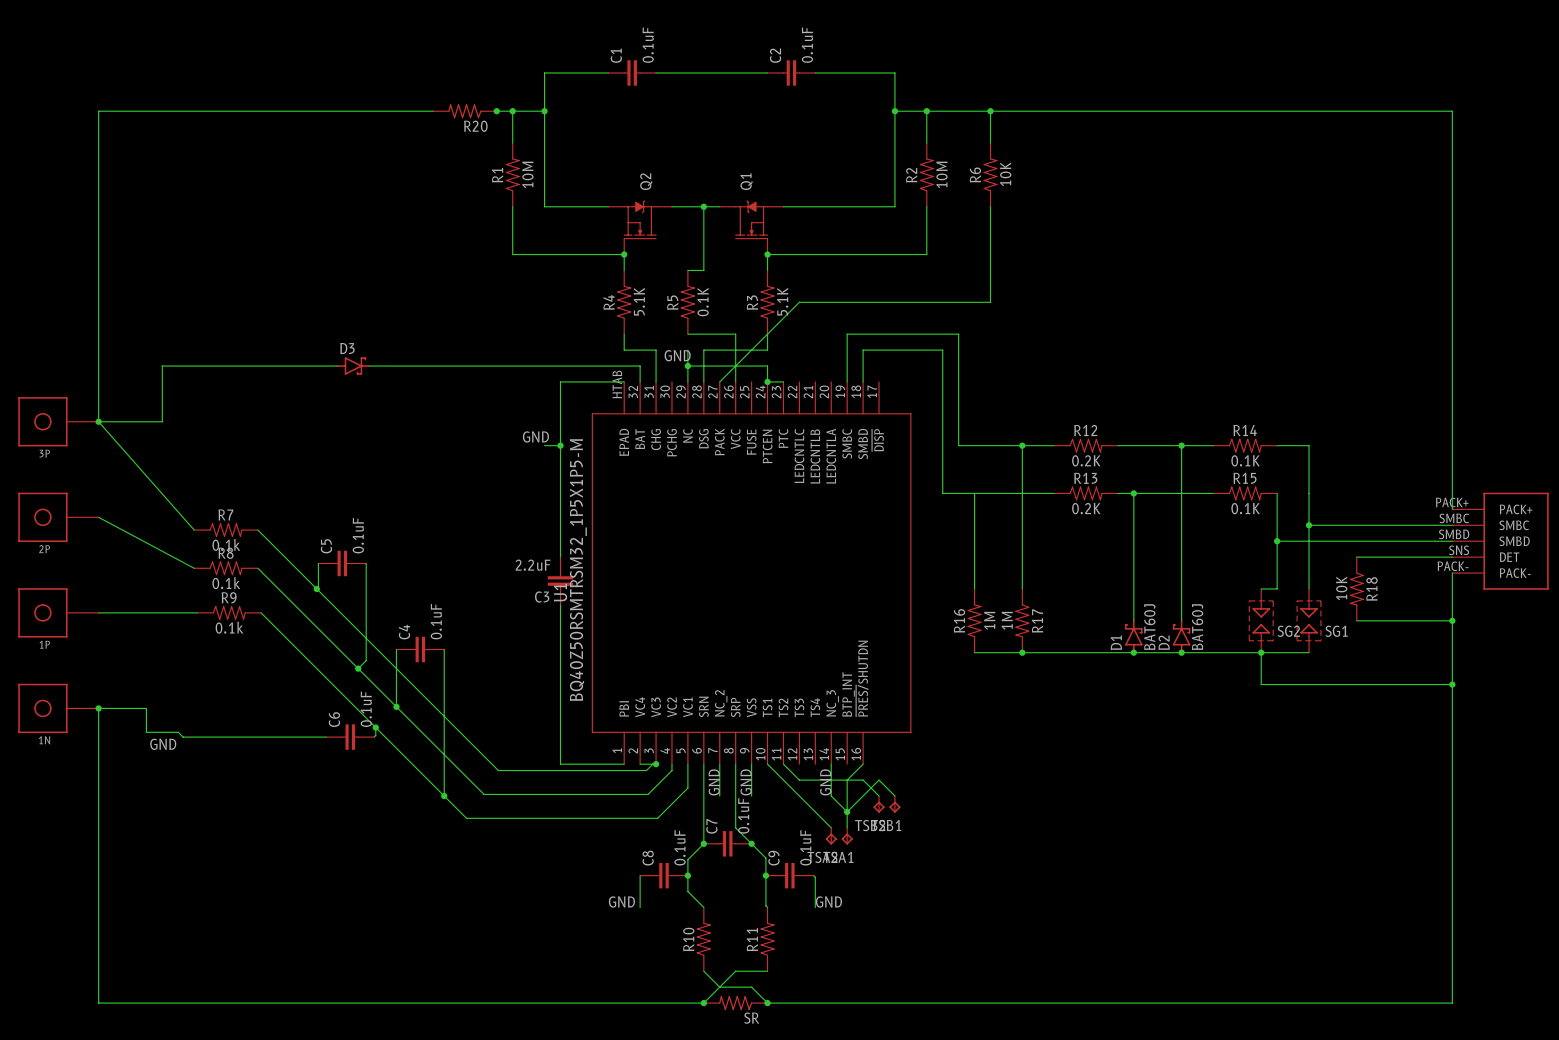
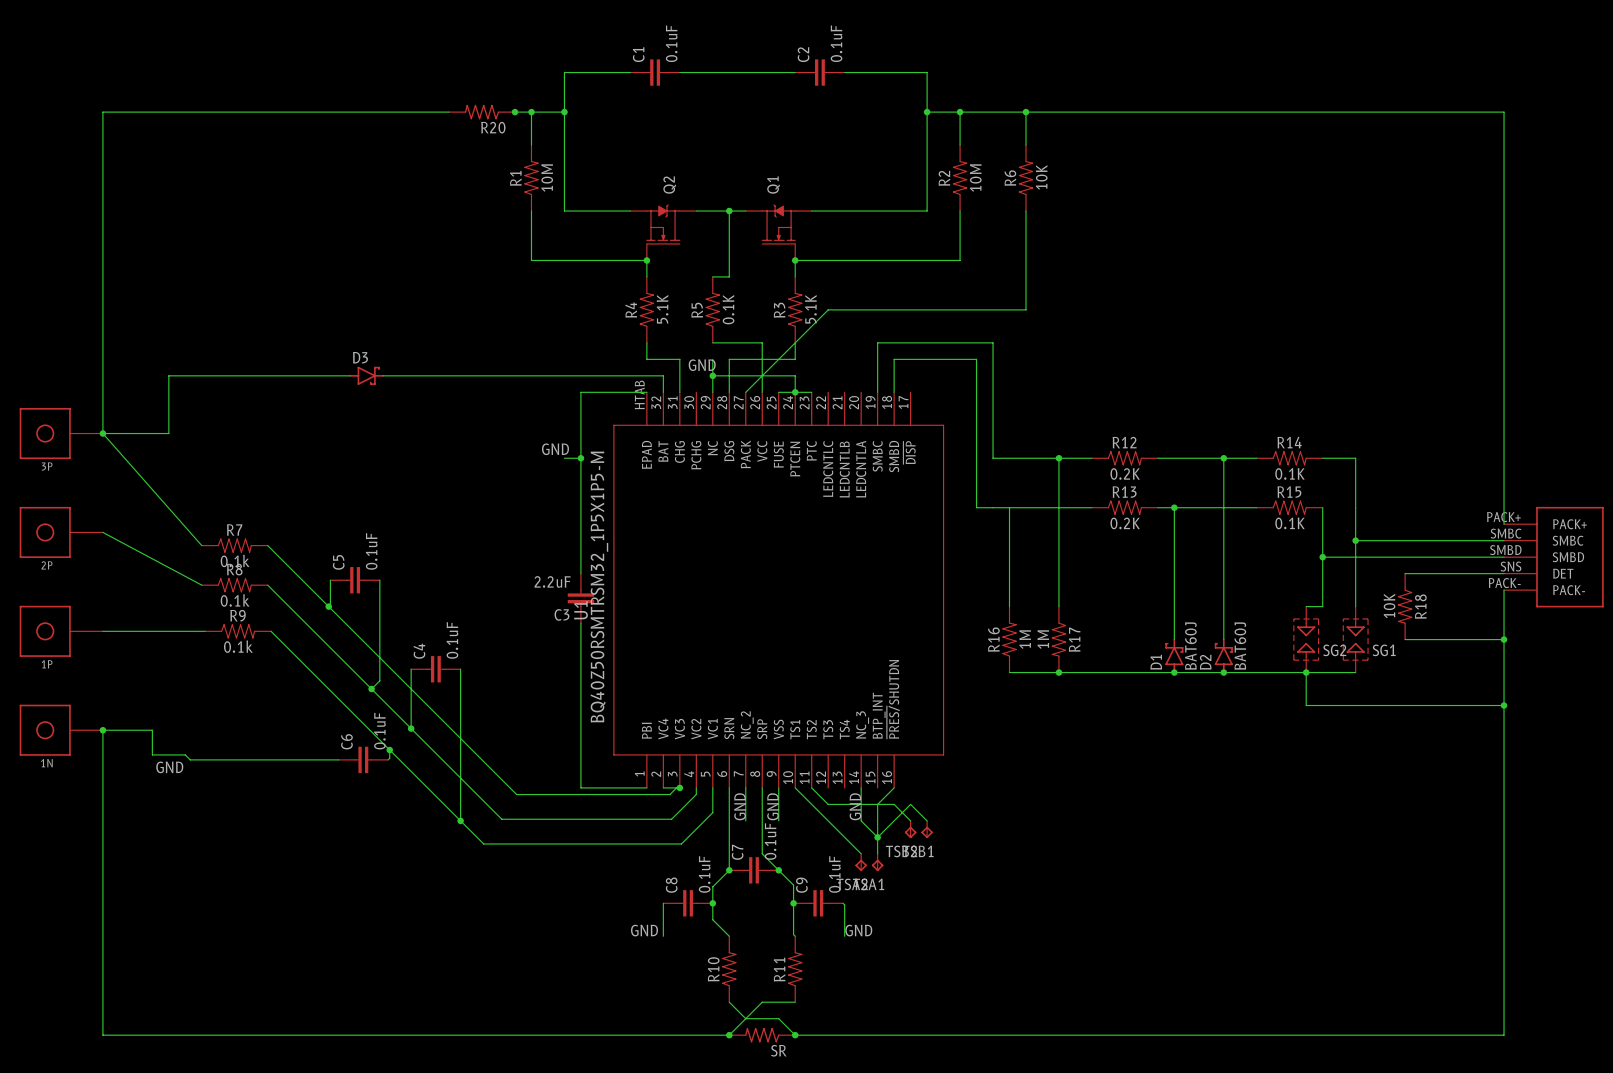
wire: none -> (778, 392) (795, 392)

